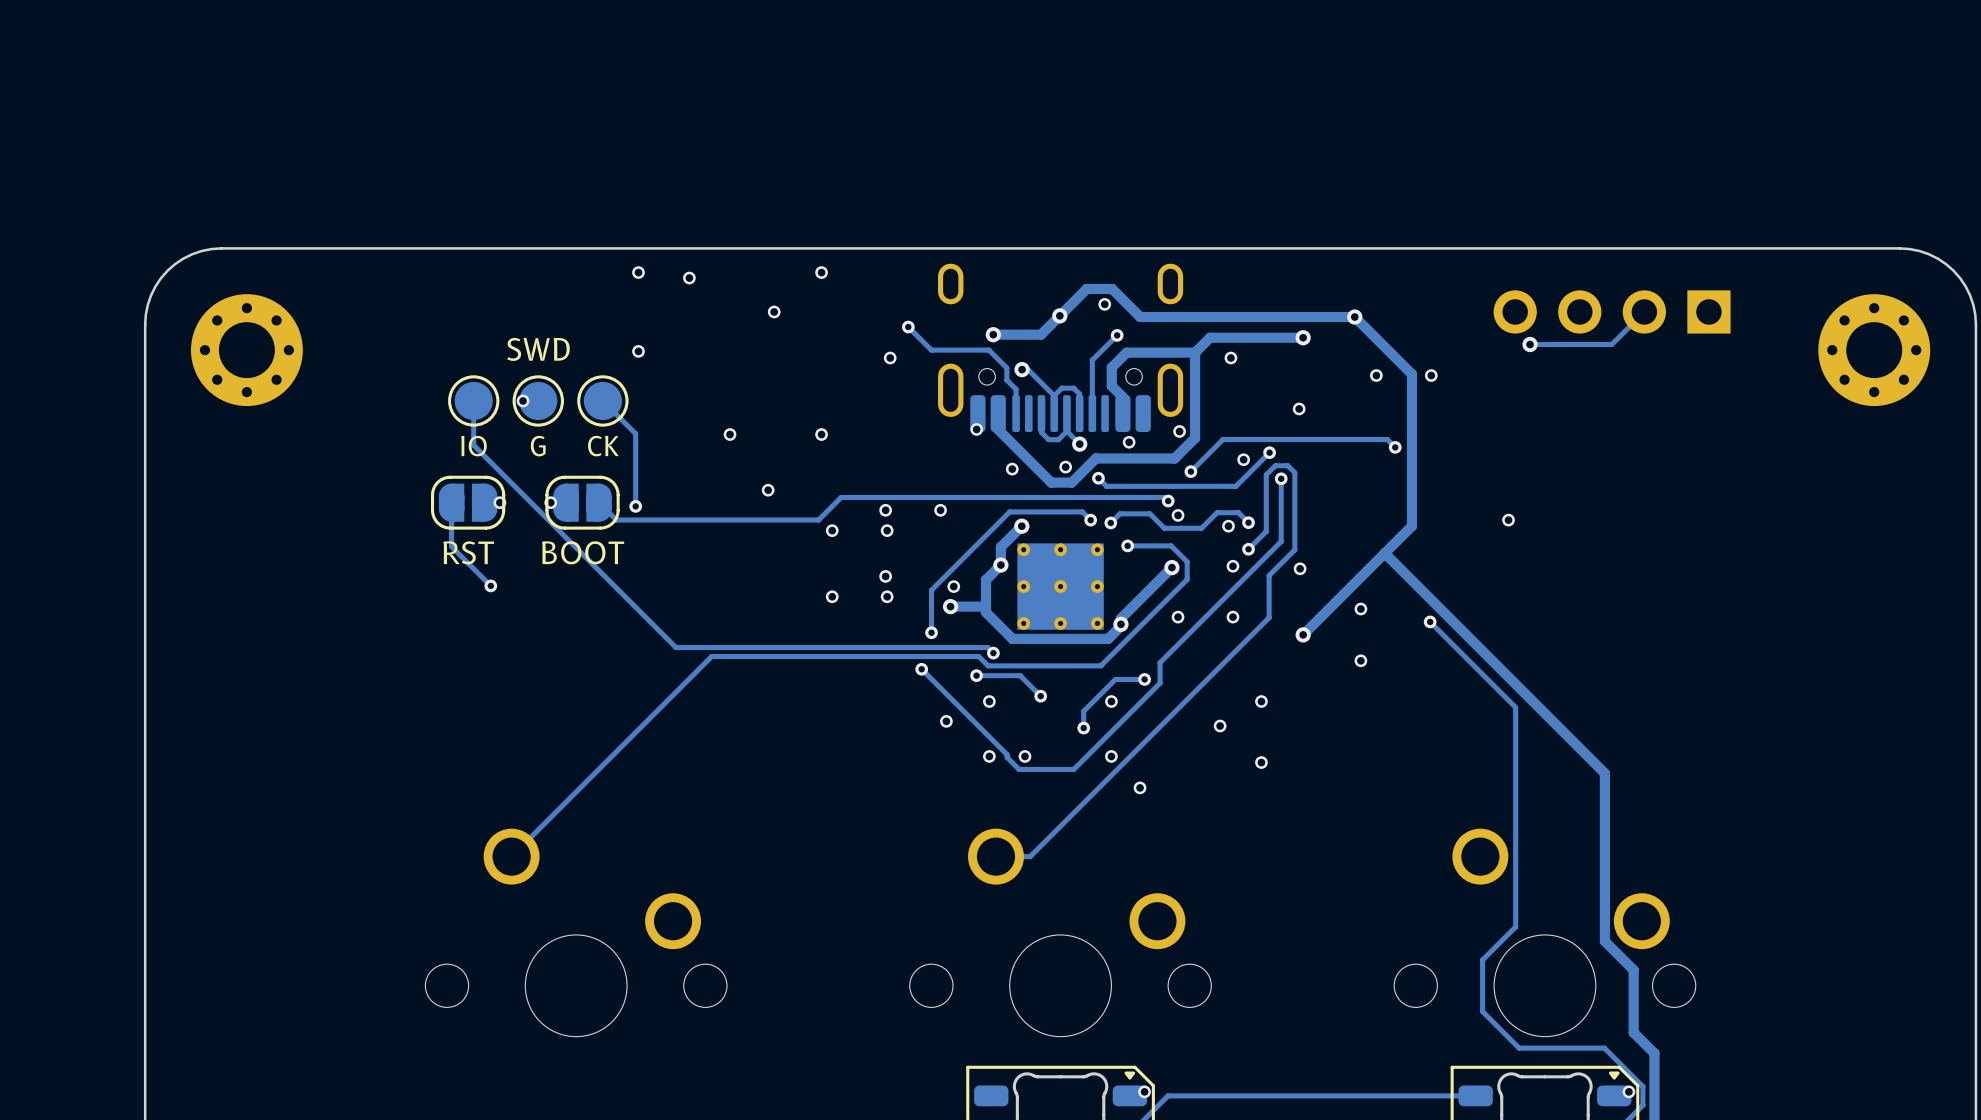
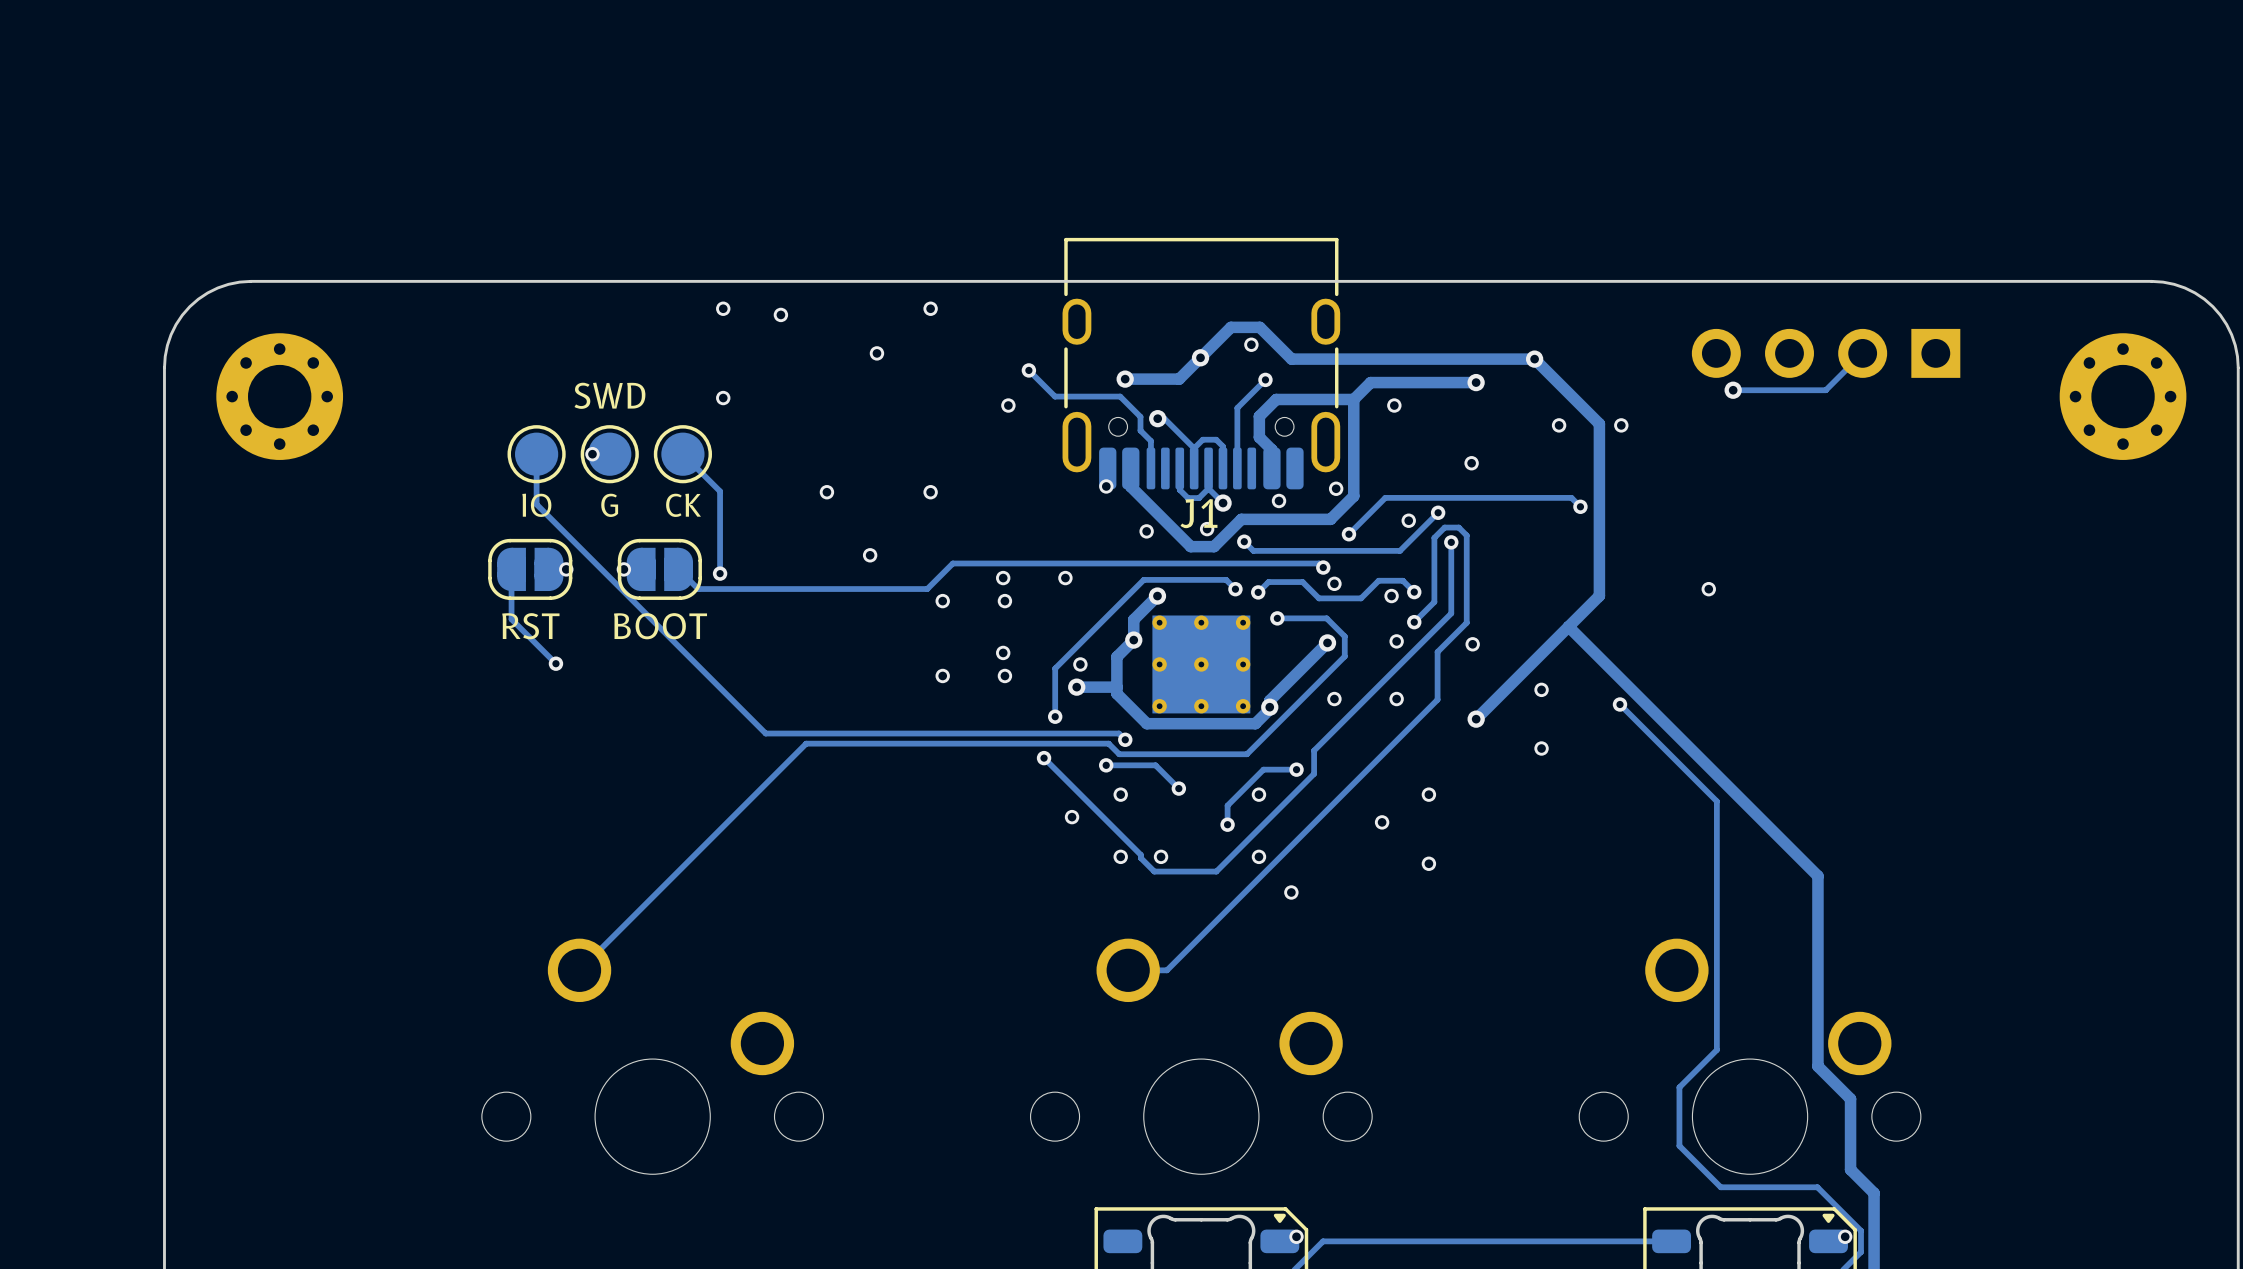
J1: none -> (1201, 363)

